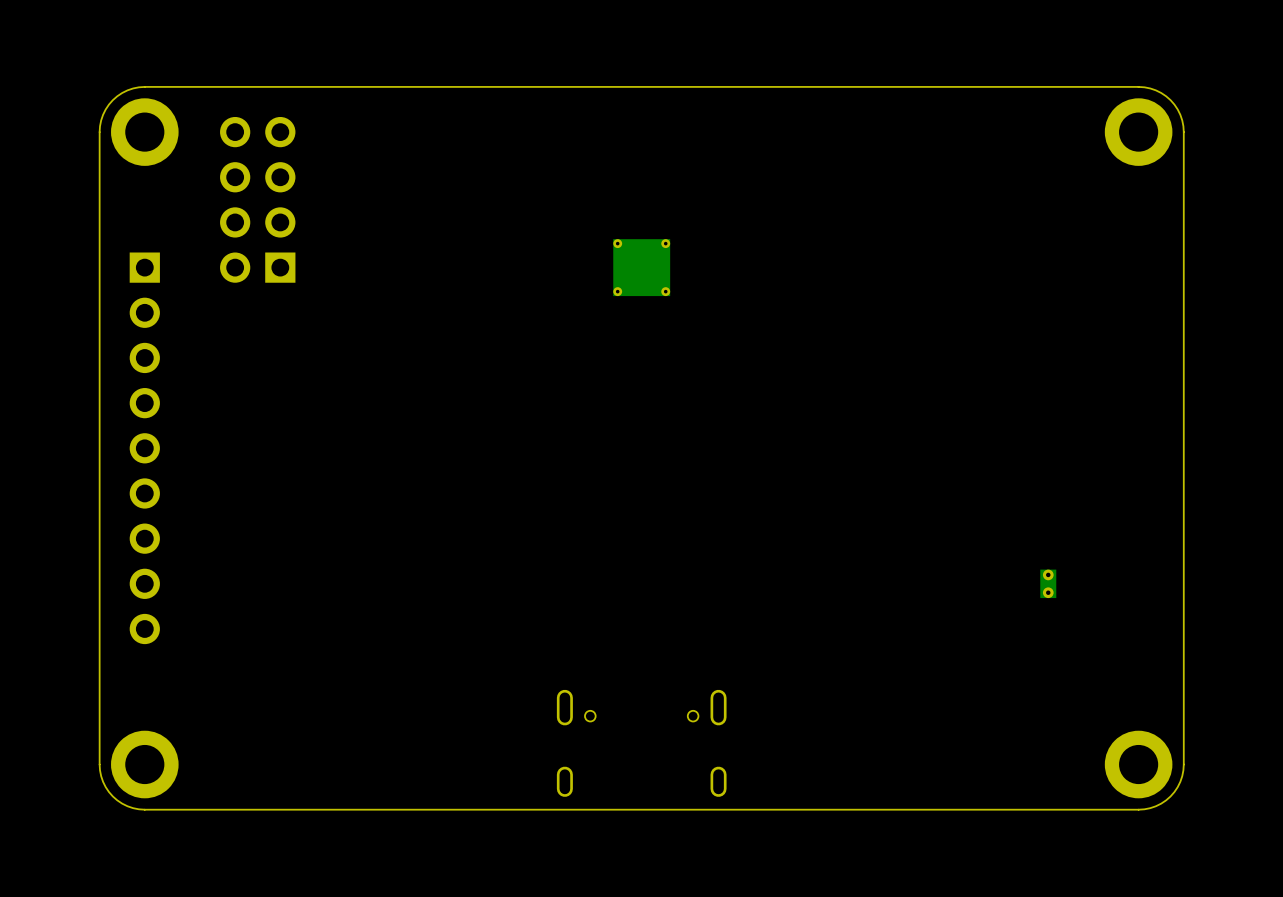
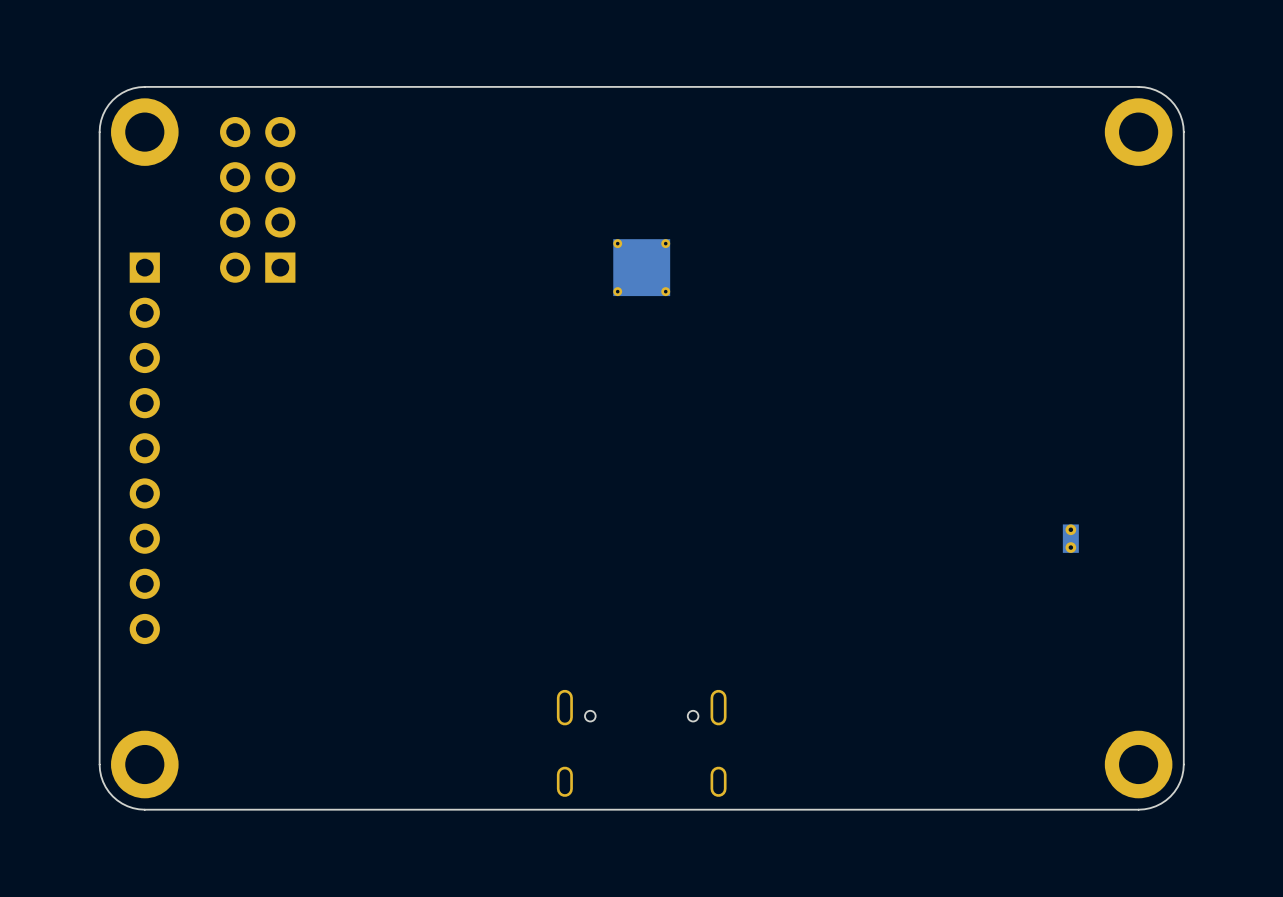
part position: (1048, 583) -> (1070, 538)

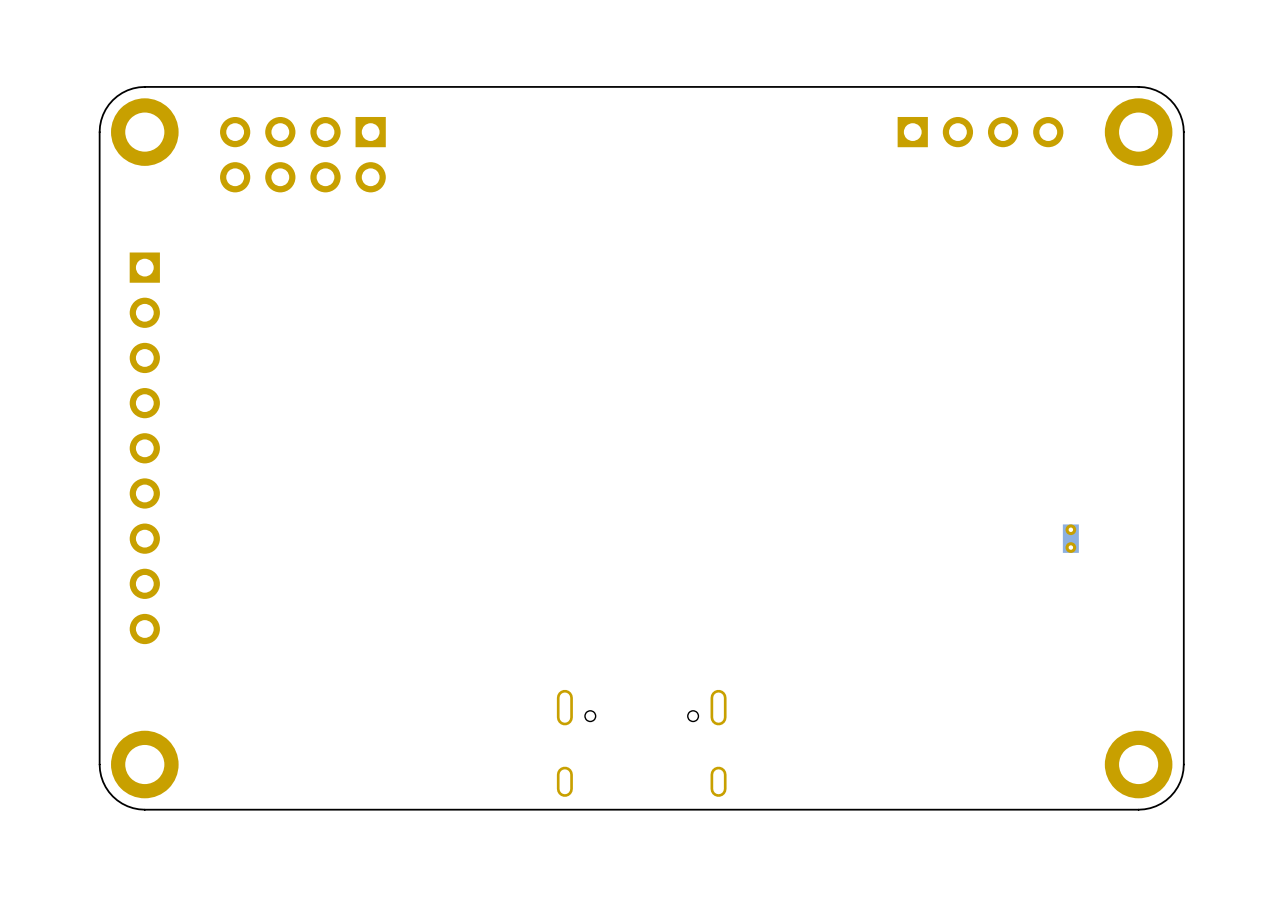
part: none -> (980, 132)
part rotation: 0° (257, 199) -> 90° counterclockwise (302, 154)
part: (641, 267) -> none

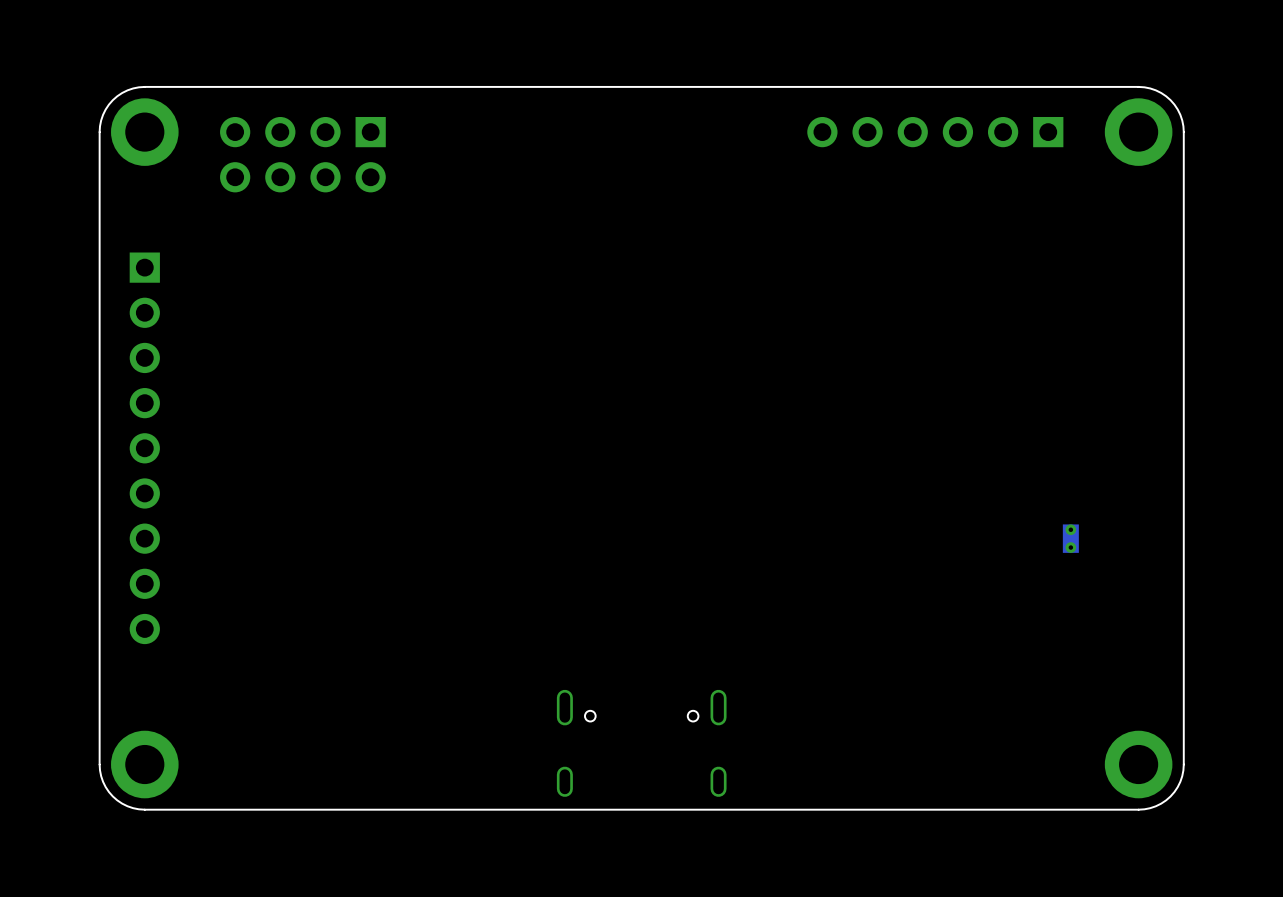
part: none -> (935, 132)
part: (980, 132) -> none

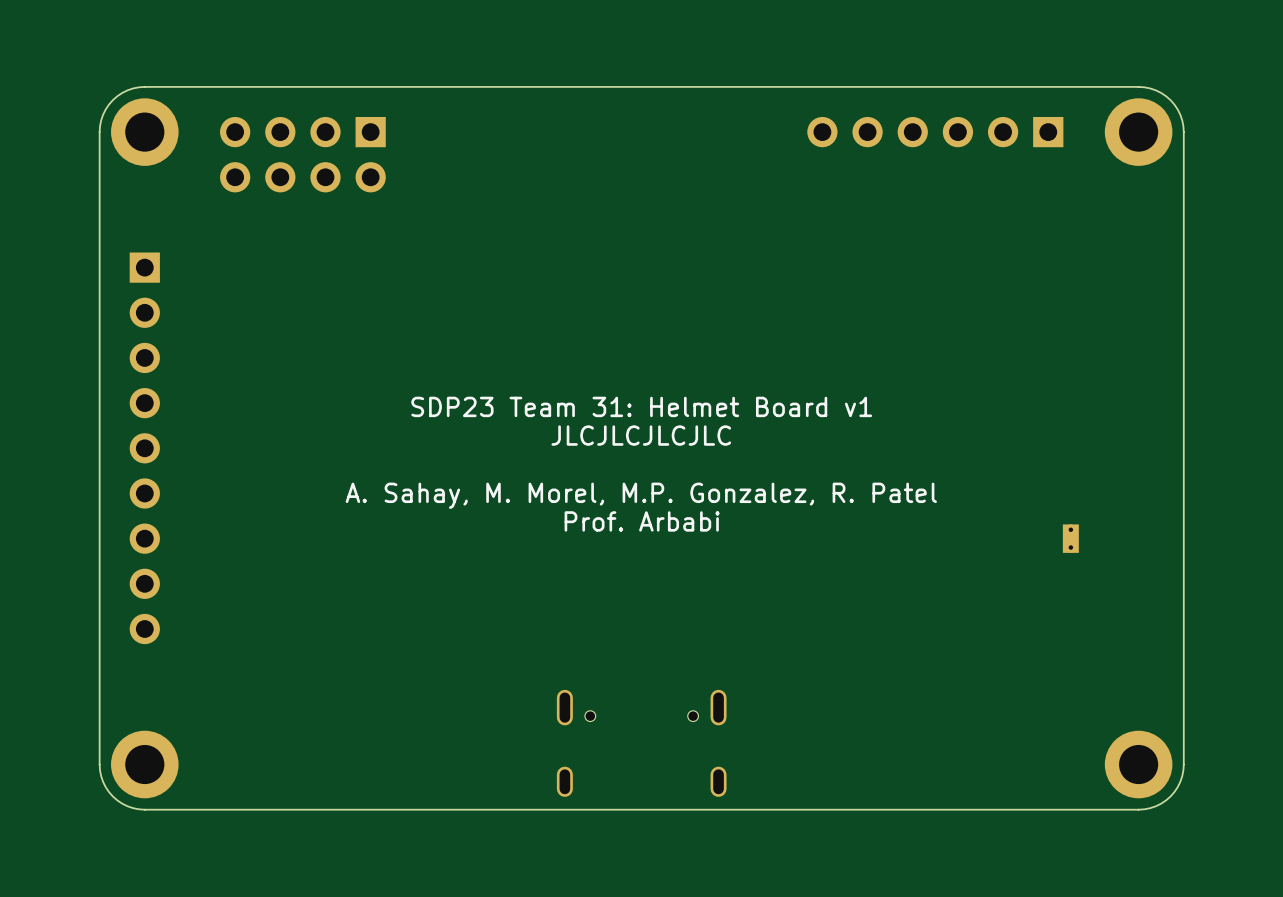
text: none -> SDP23 Team 31: Helmet Board v1 (641, 406)
text: none -> JLCJLCJLCJLC (641, 435)
text: none -> A. Sahay, M. Morel, M.P. Gonzalez, R. Patel (641, 495)
text: none -> Prof. Arbabi (642, 521)

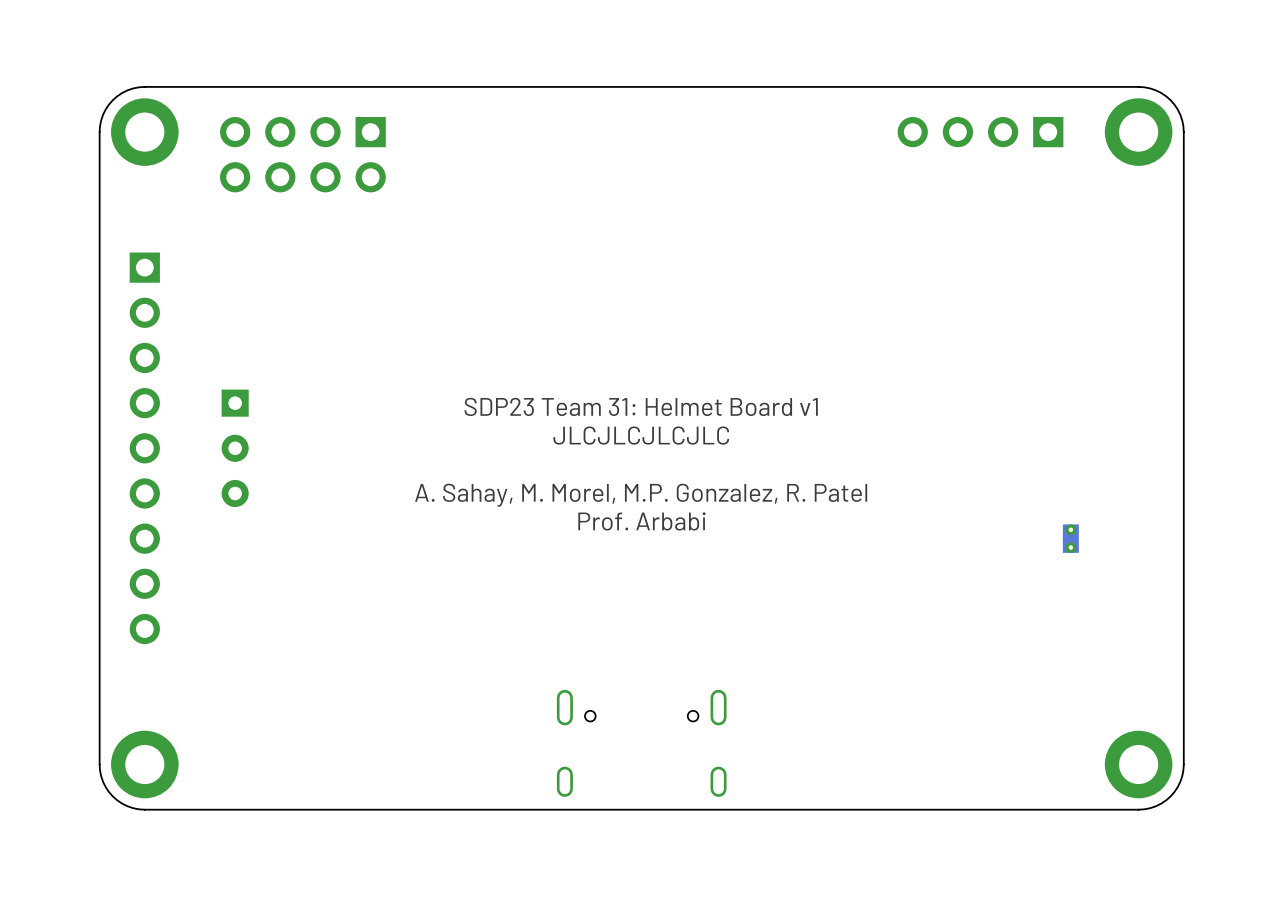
part: (935, 132) -> none
part: none -> (235, 448)

